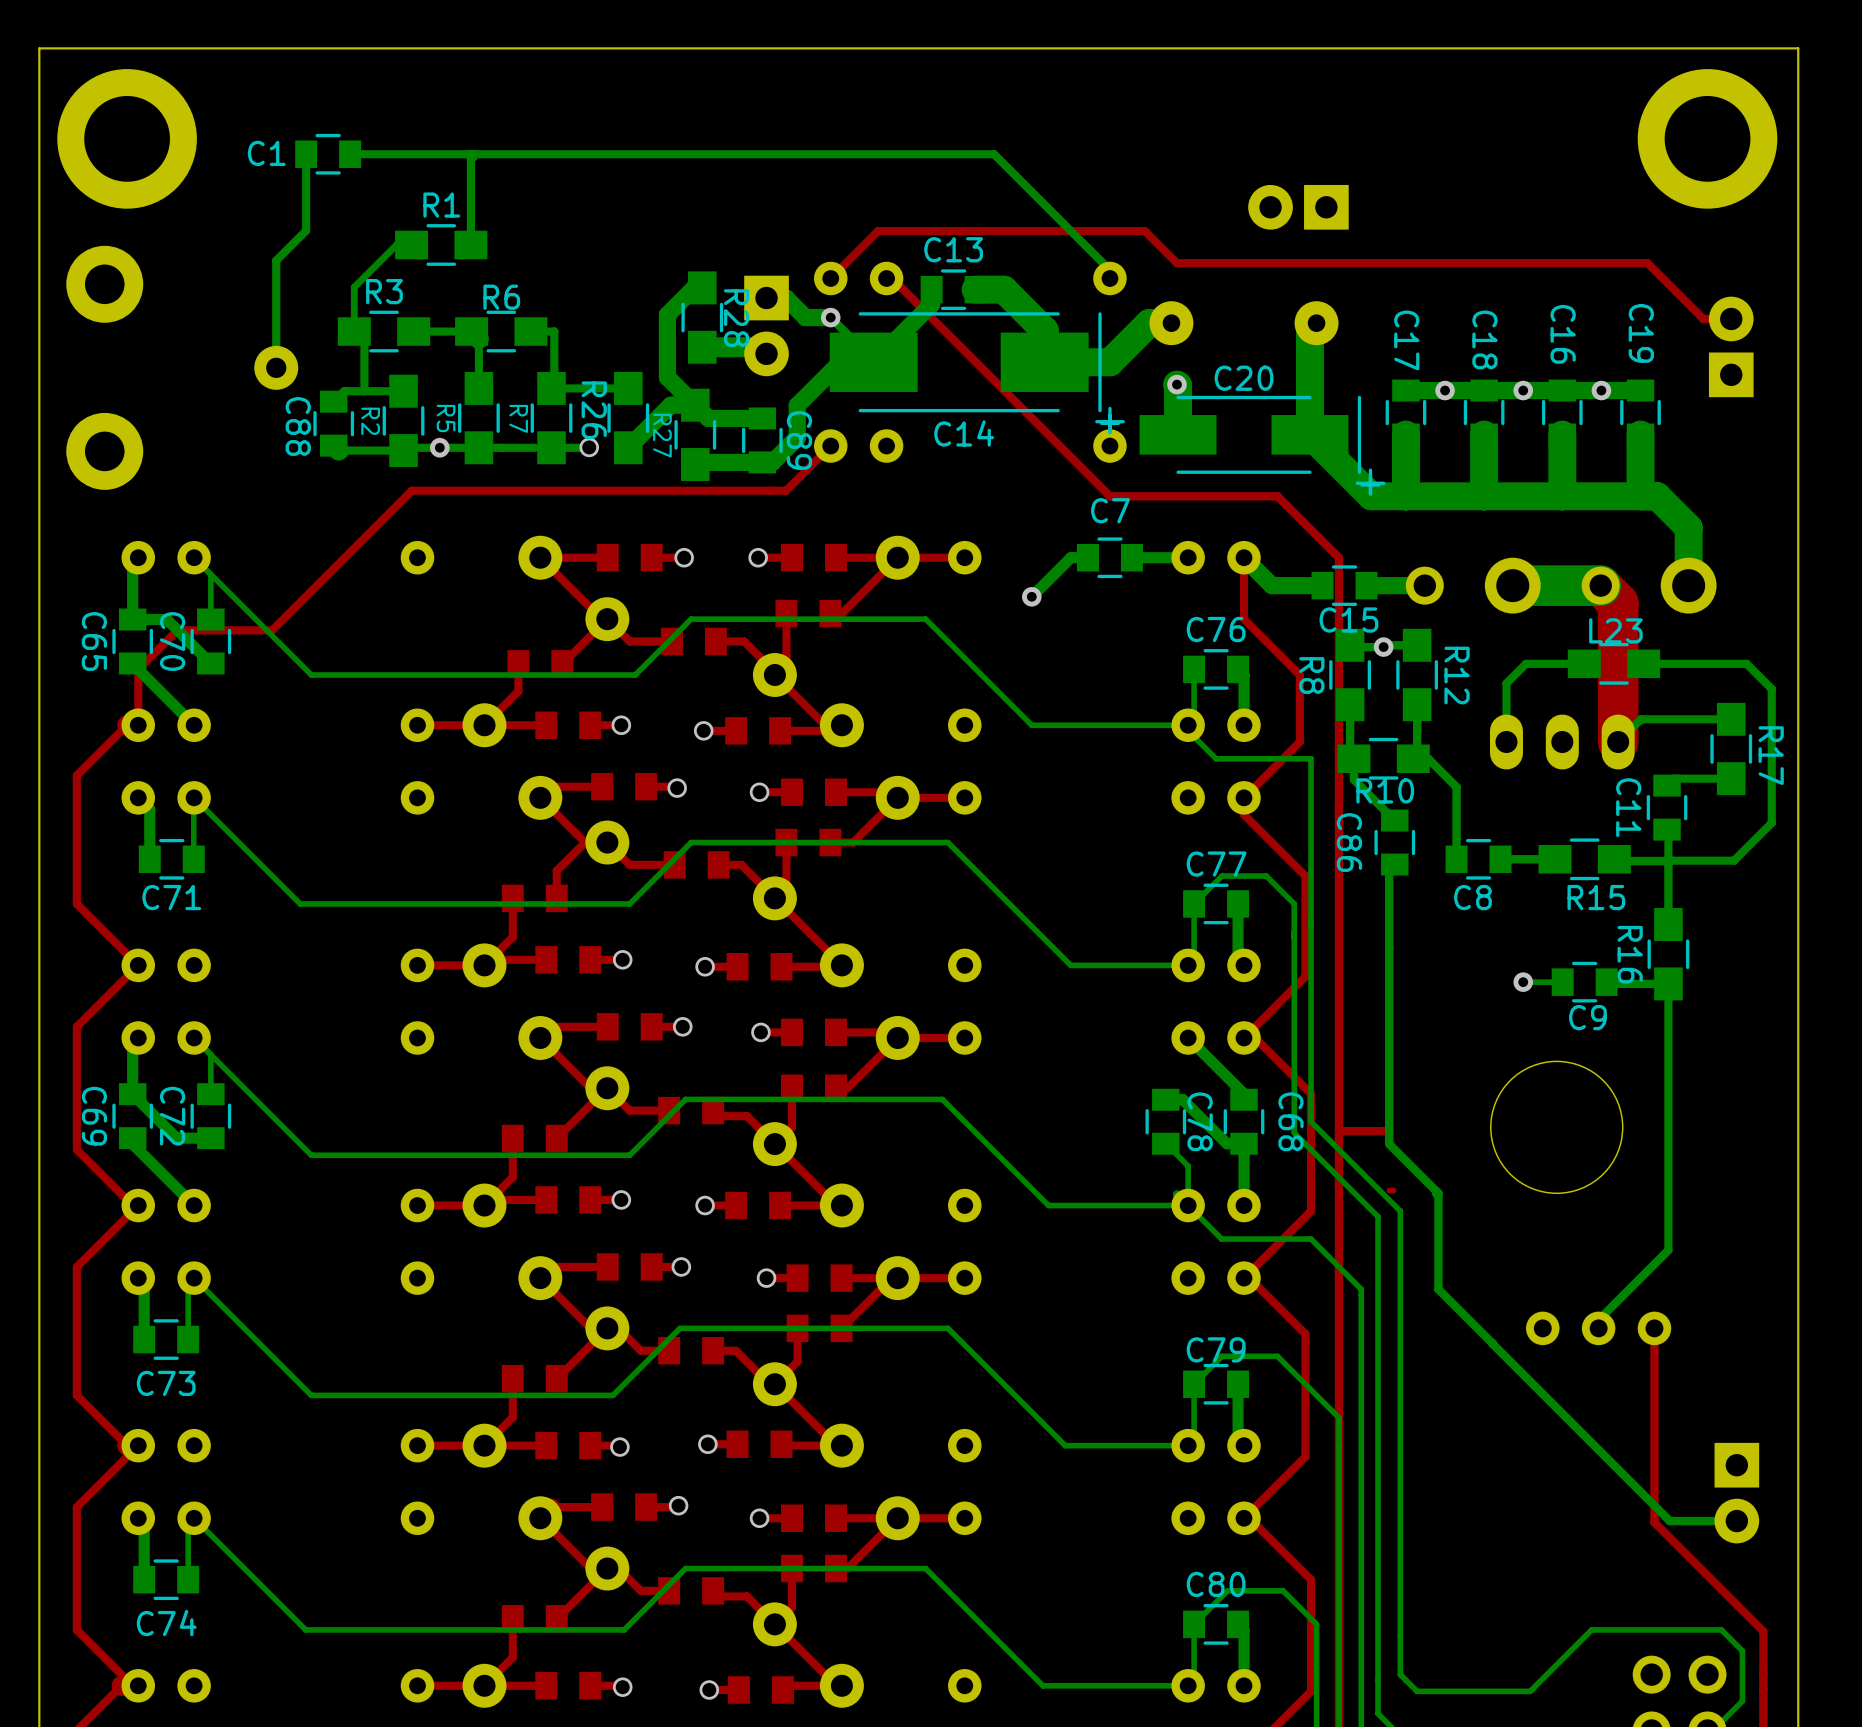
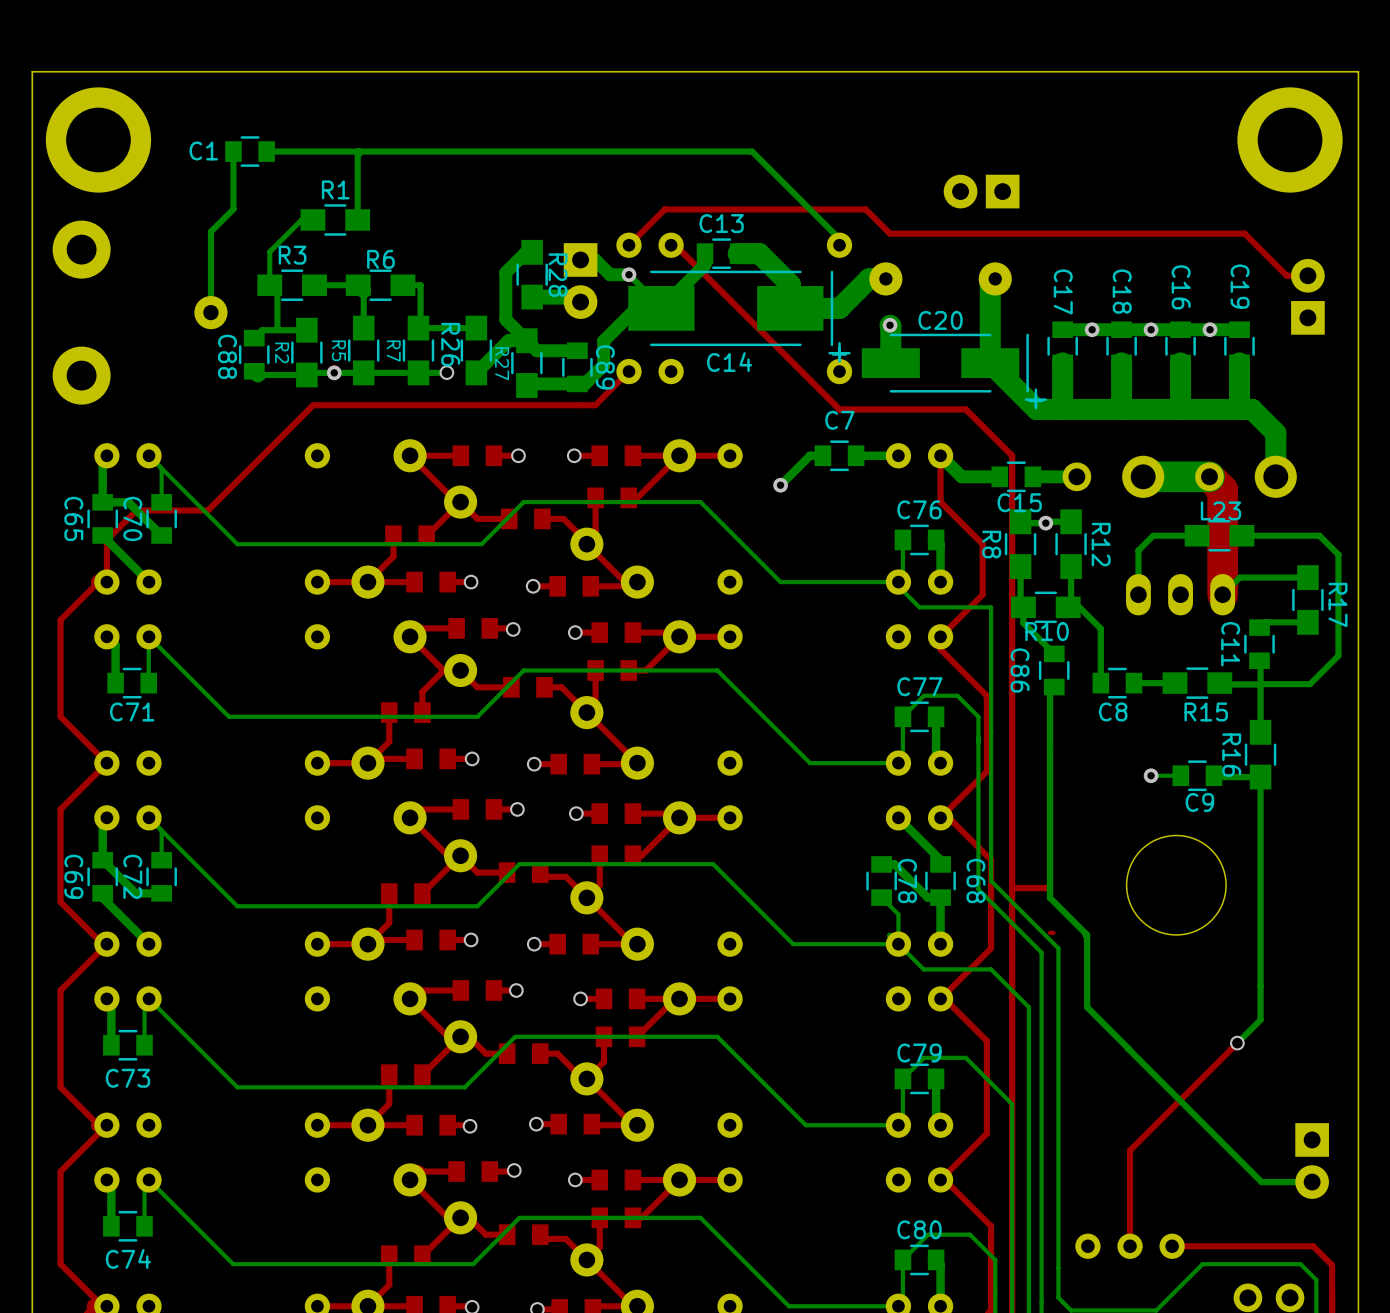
bottom track: (1668, 1250) (1598, 1320) (1598, 1328) -> (1260, 977) (1260, 1019) (1237, 1043)
part position: (1598, 1328) -> (1130, 1246)
top track: (1654, 1328) (1654, 1522) (1738, 1606) -> (1172, 1246) (1313, 1246)
top track: none -> (1237, 1043) (1130, 1150) (1130, 1246)
via: none -> (1237, 1043)

